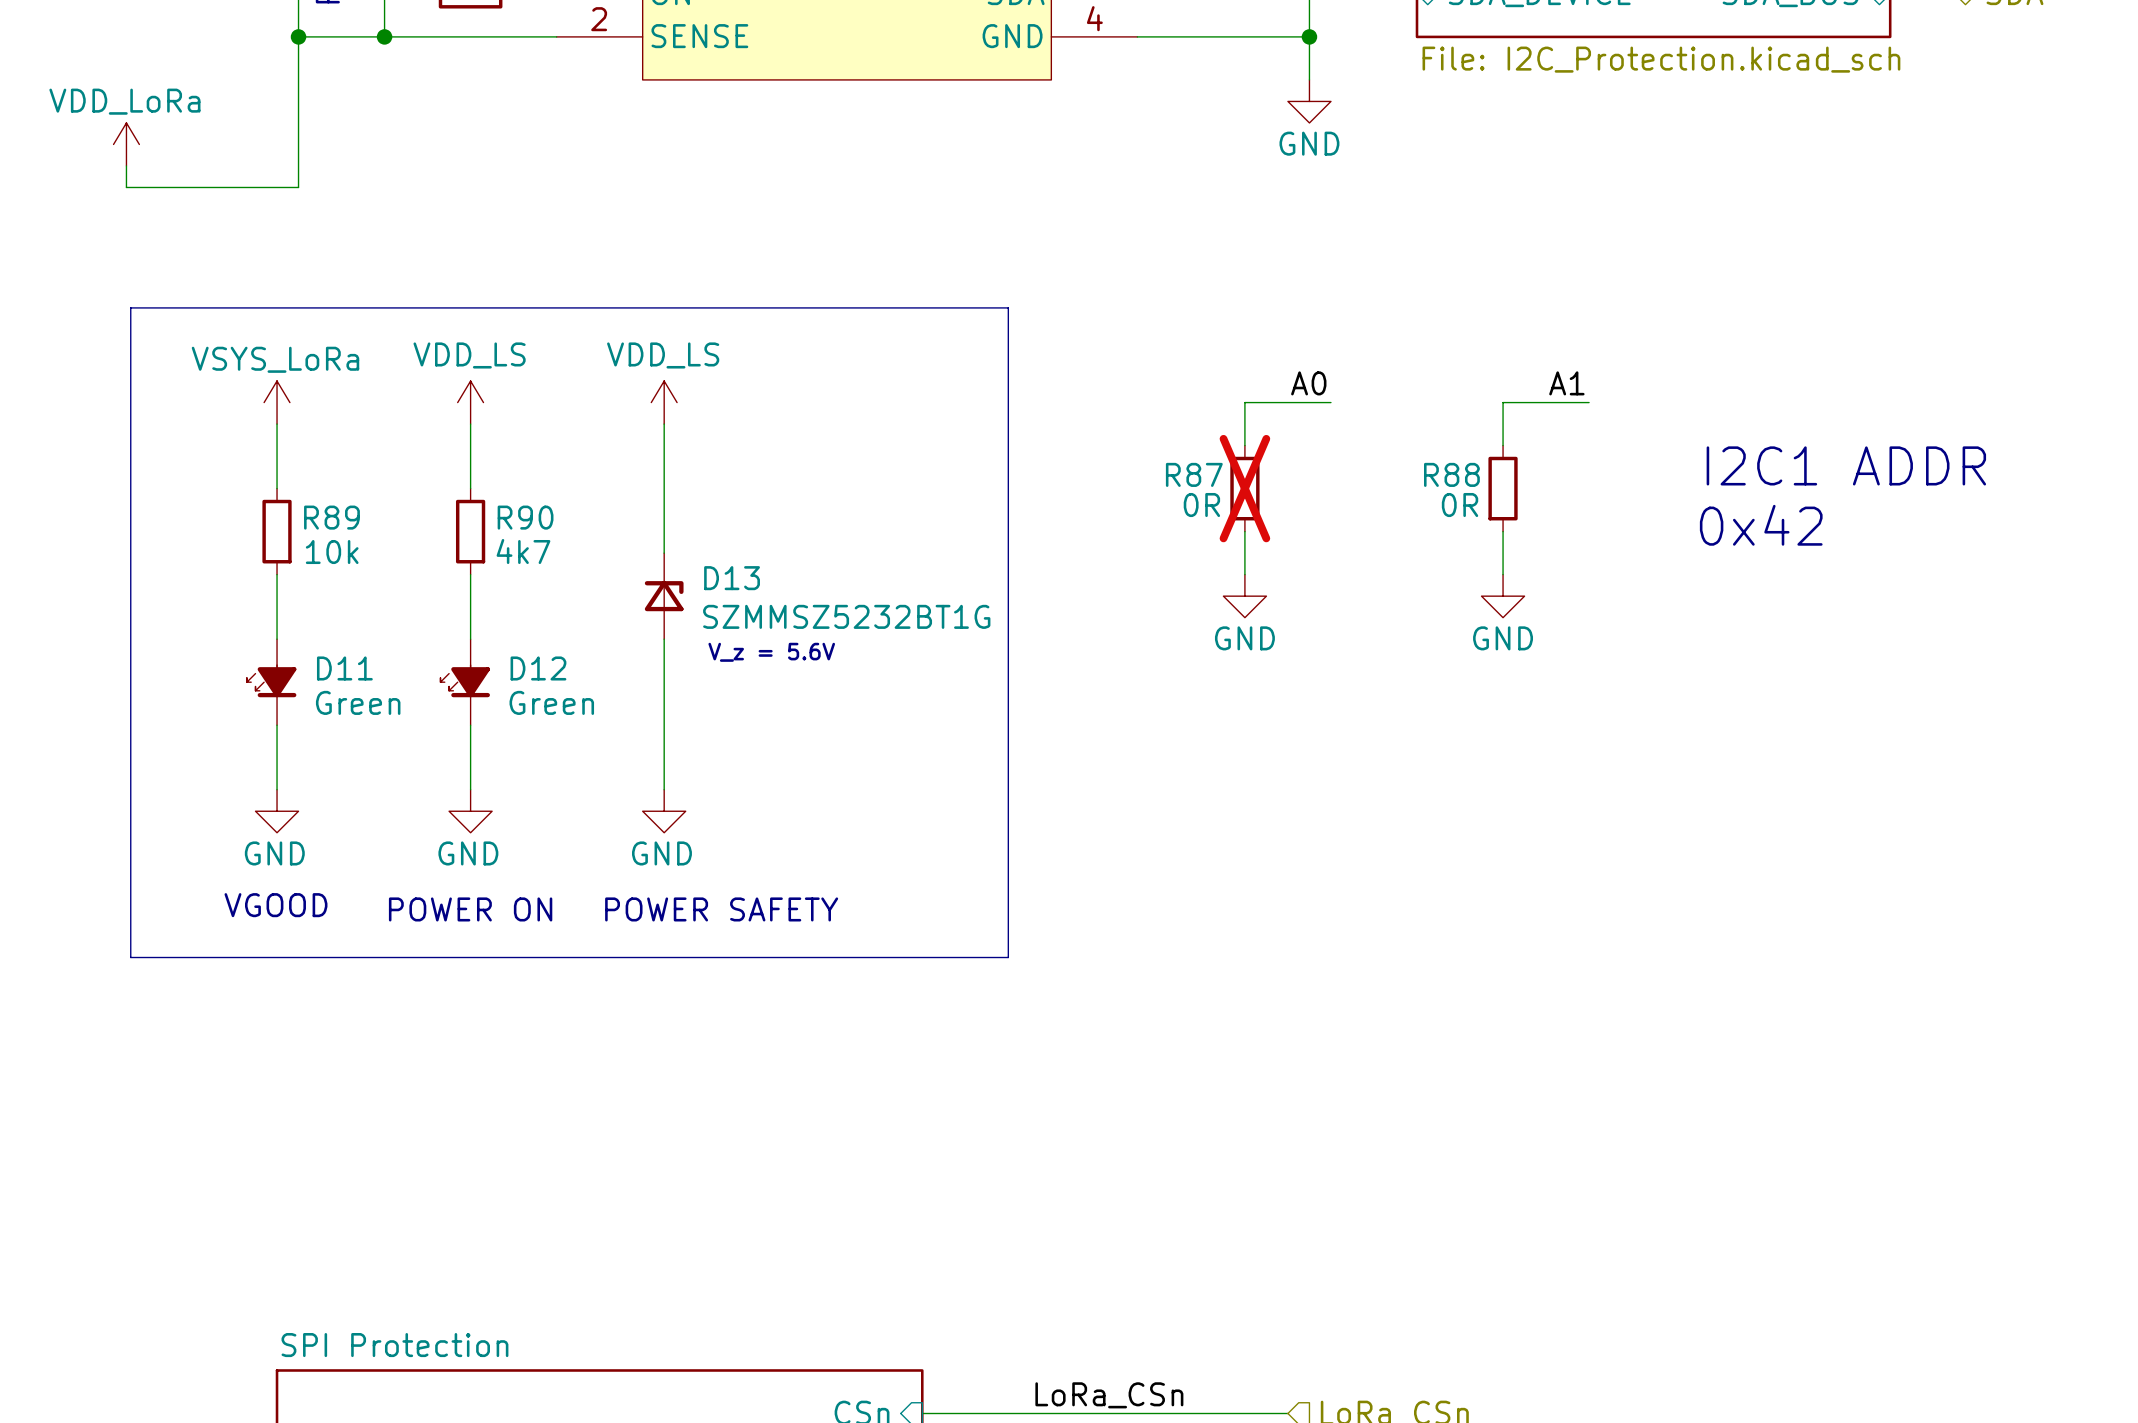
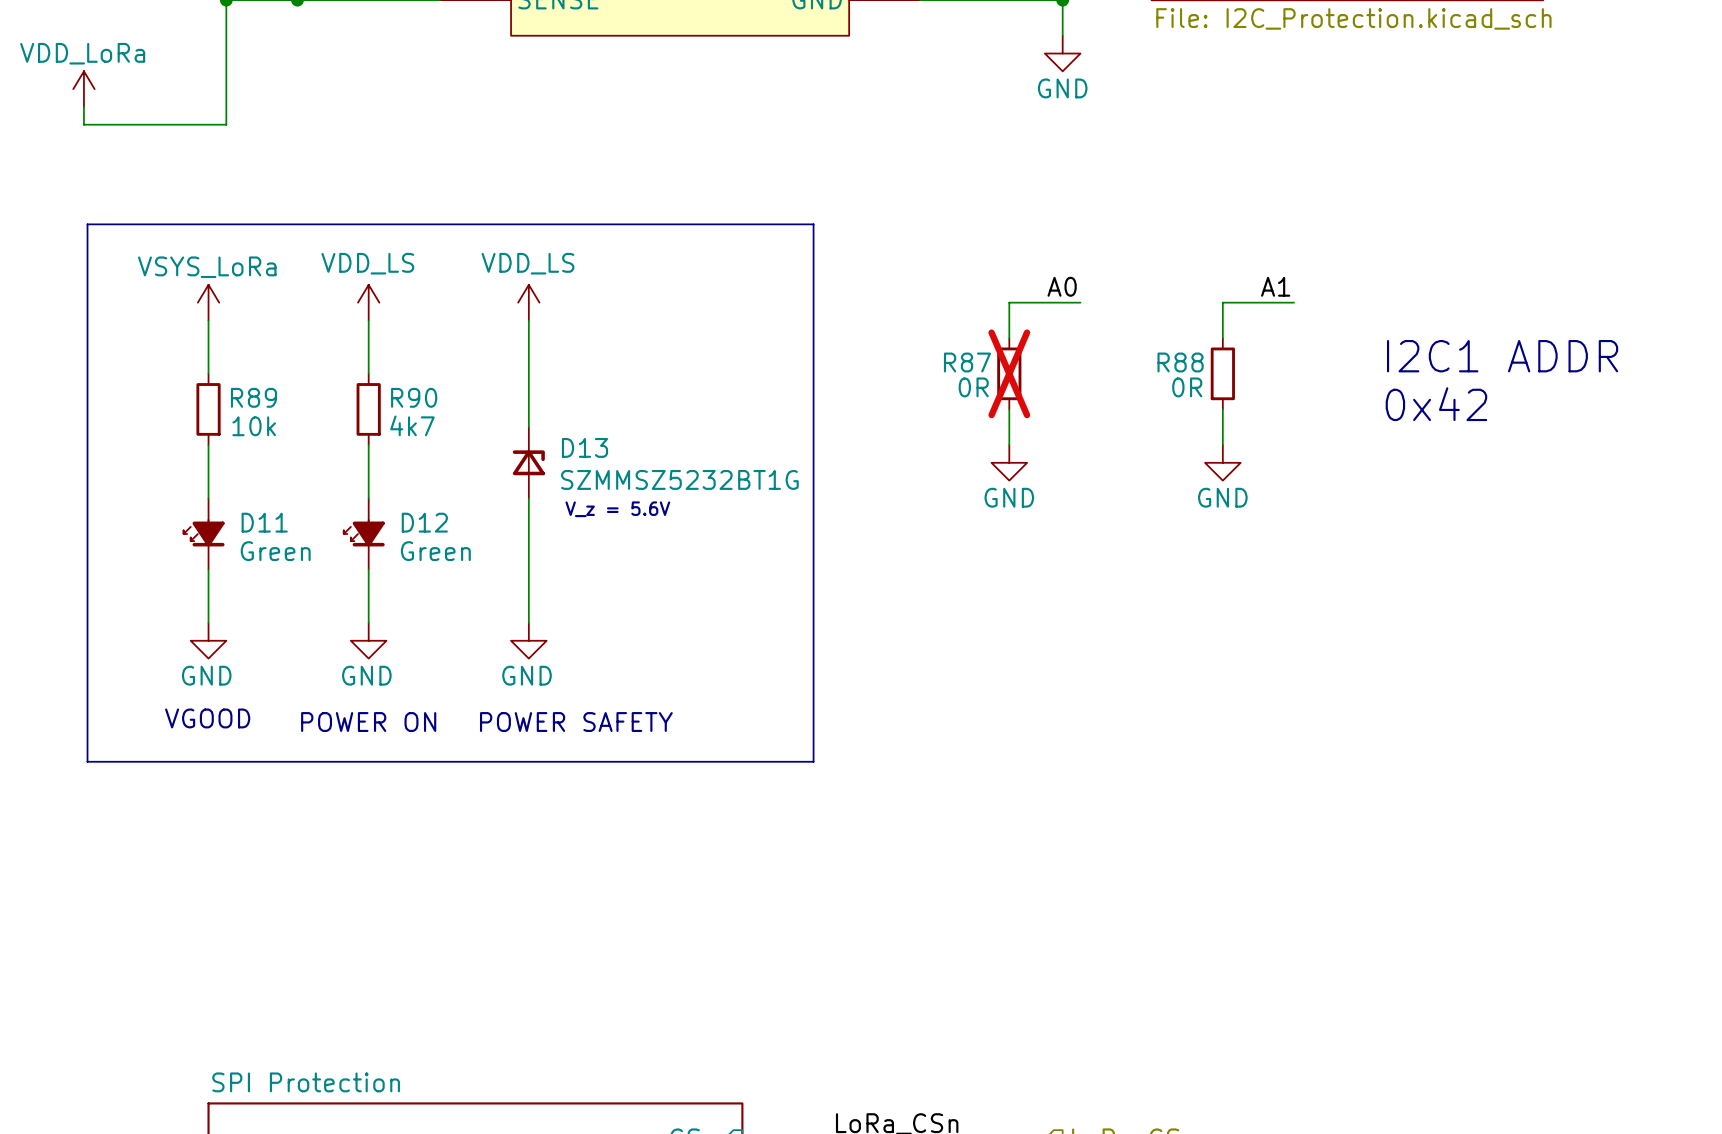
text position: I2C1 ADDR (1846, 465) -> I2C1 ADDR (1502, 356)

